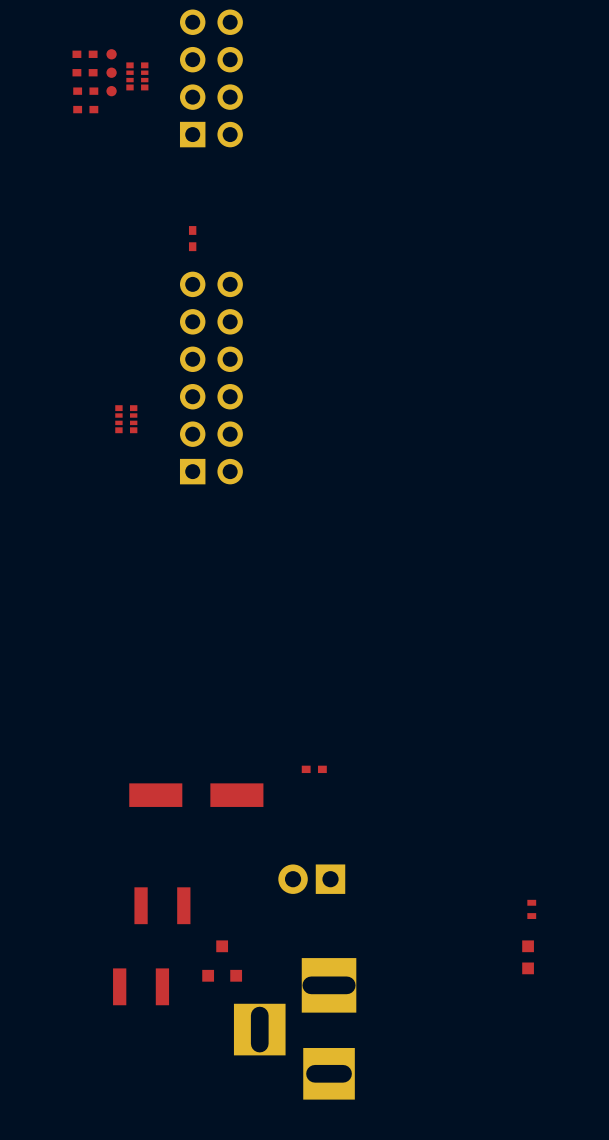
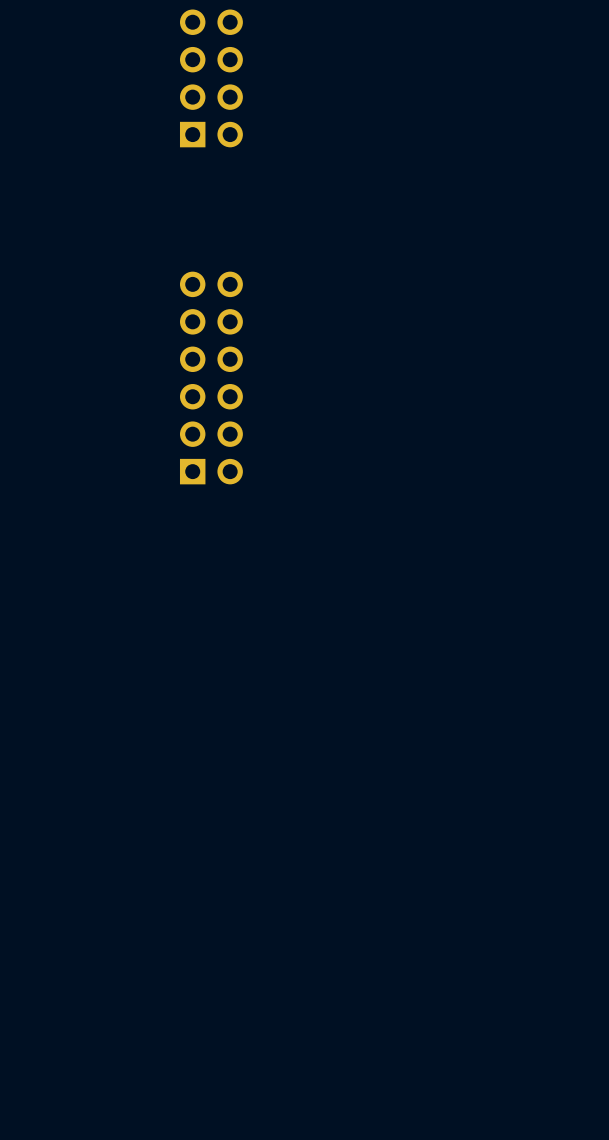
part: (85, 54) -> none
part: (111, 54) -> none
part: (85, 72) -> none
part: (111, 72) -> none
part: (137, 76) -> none
part: (85, 91) -> none
part: (111, 91) -> none
part: (85, 109) -> none
part: (192, 238) -> none
part: (126, 419) -> none
part: (314, 769) -> none
part: (196, 795) -> none
part: (311, 879) -> none
part: (162, 905) -> none
part: (531, 909) -> none
part: (528, 957) -> none
part: (222, 961) -> none
part: (141, 986) -> none
part: (295, 1028) -> none

